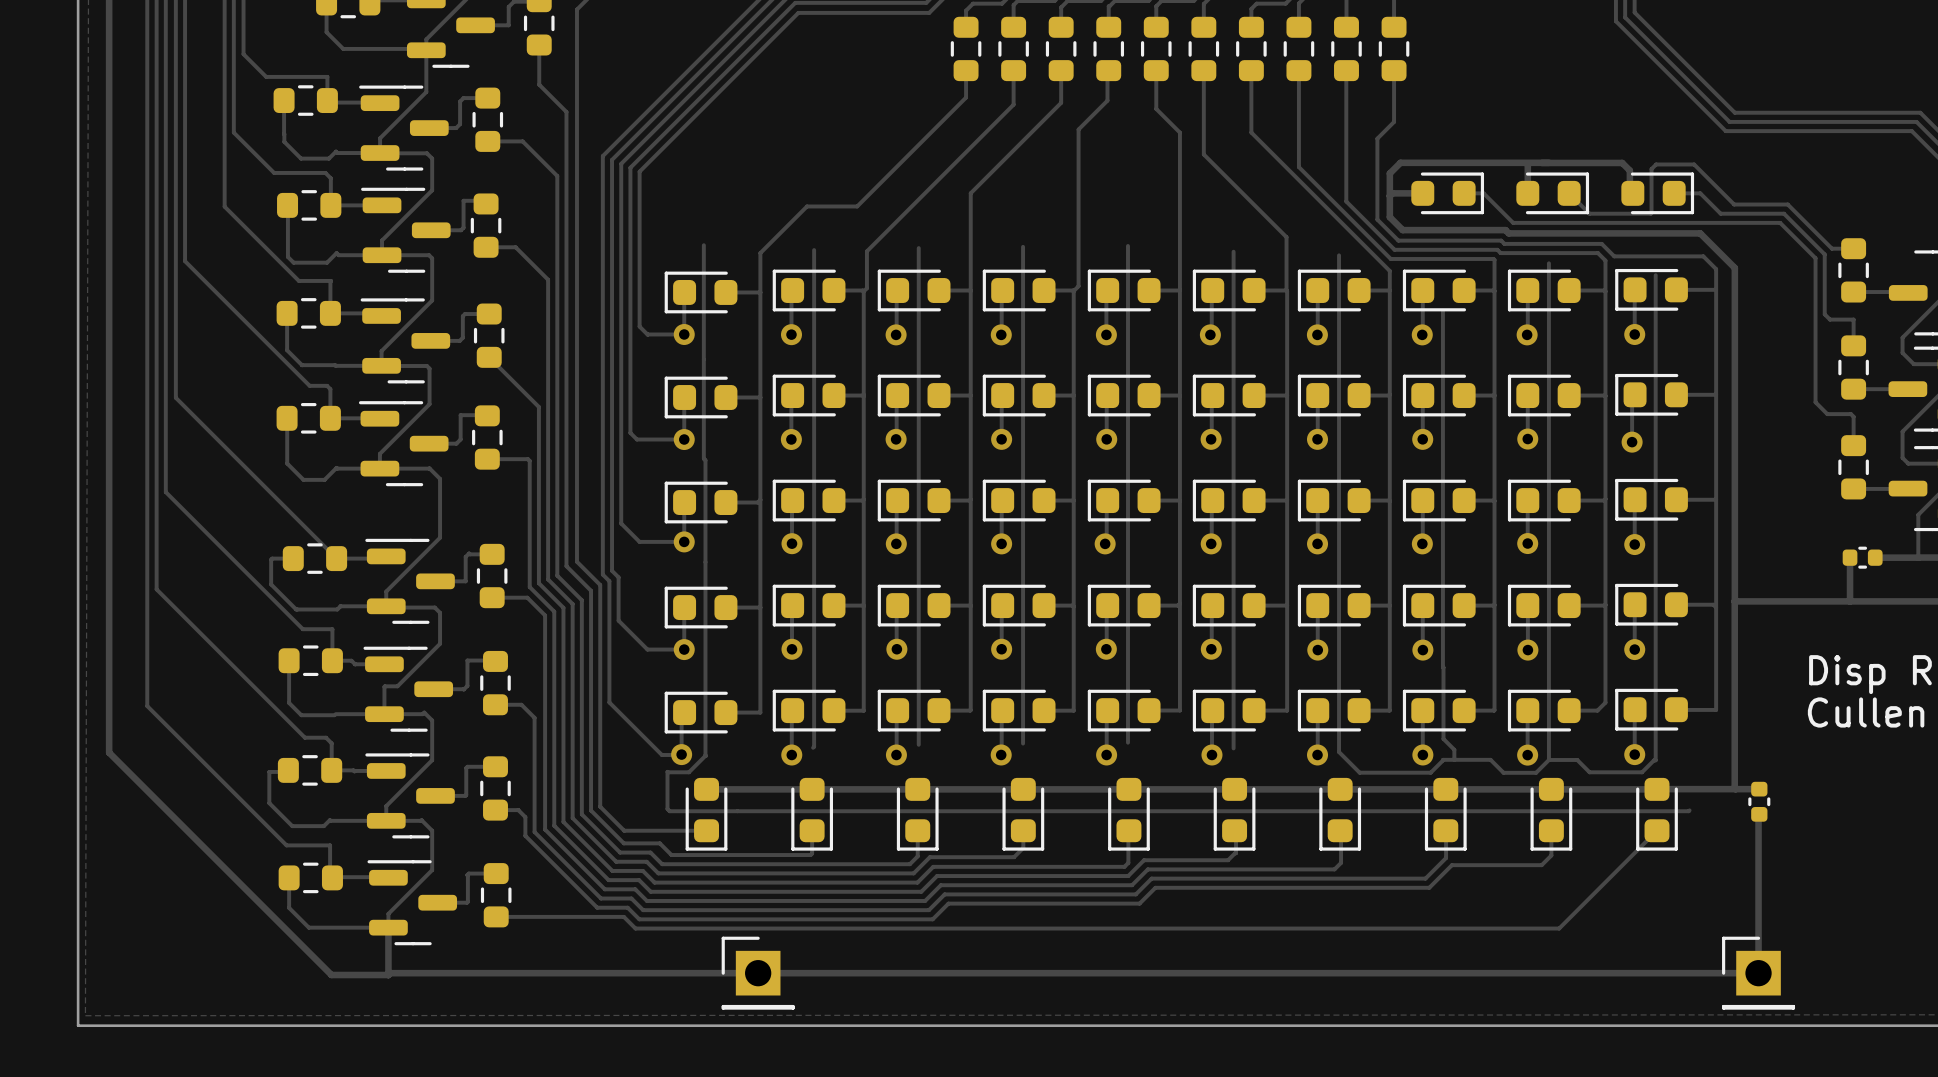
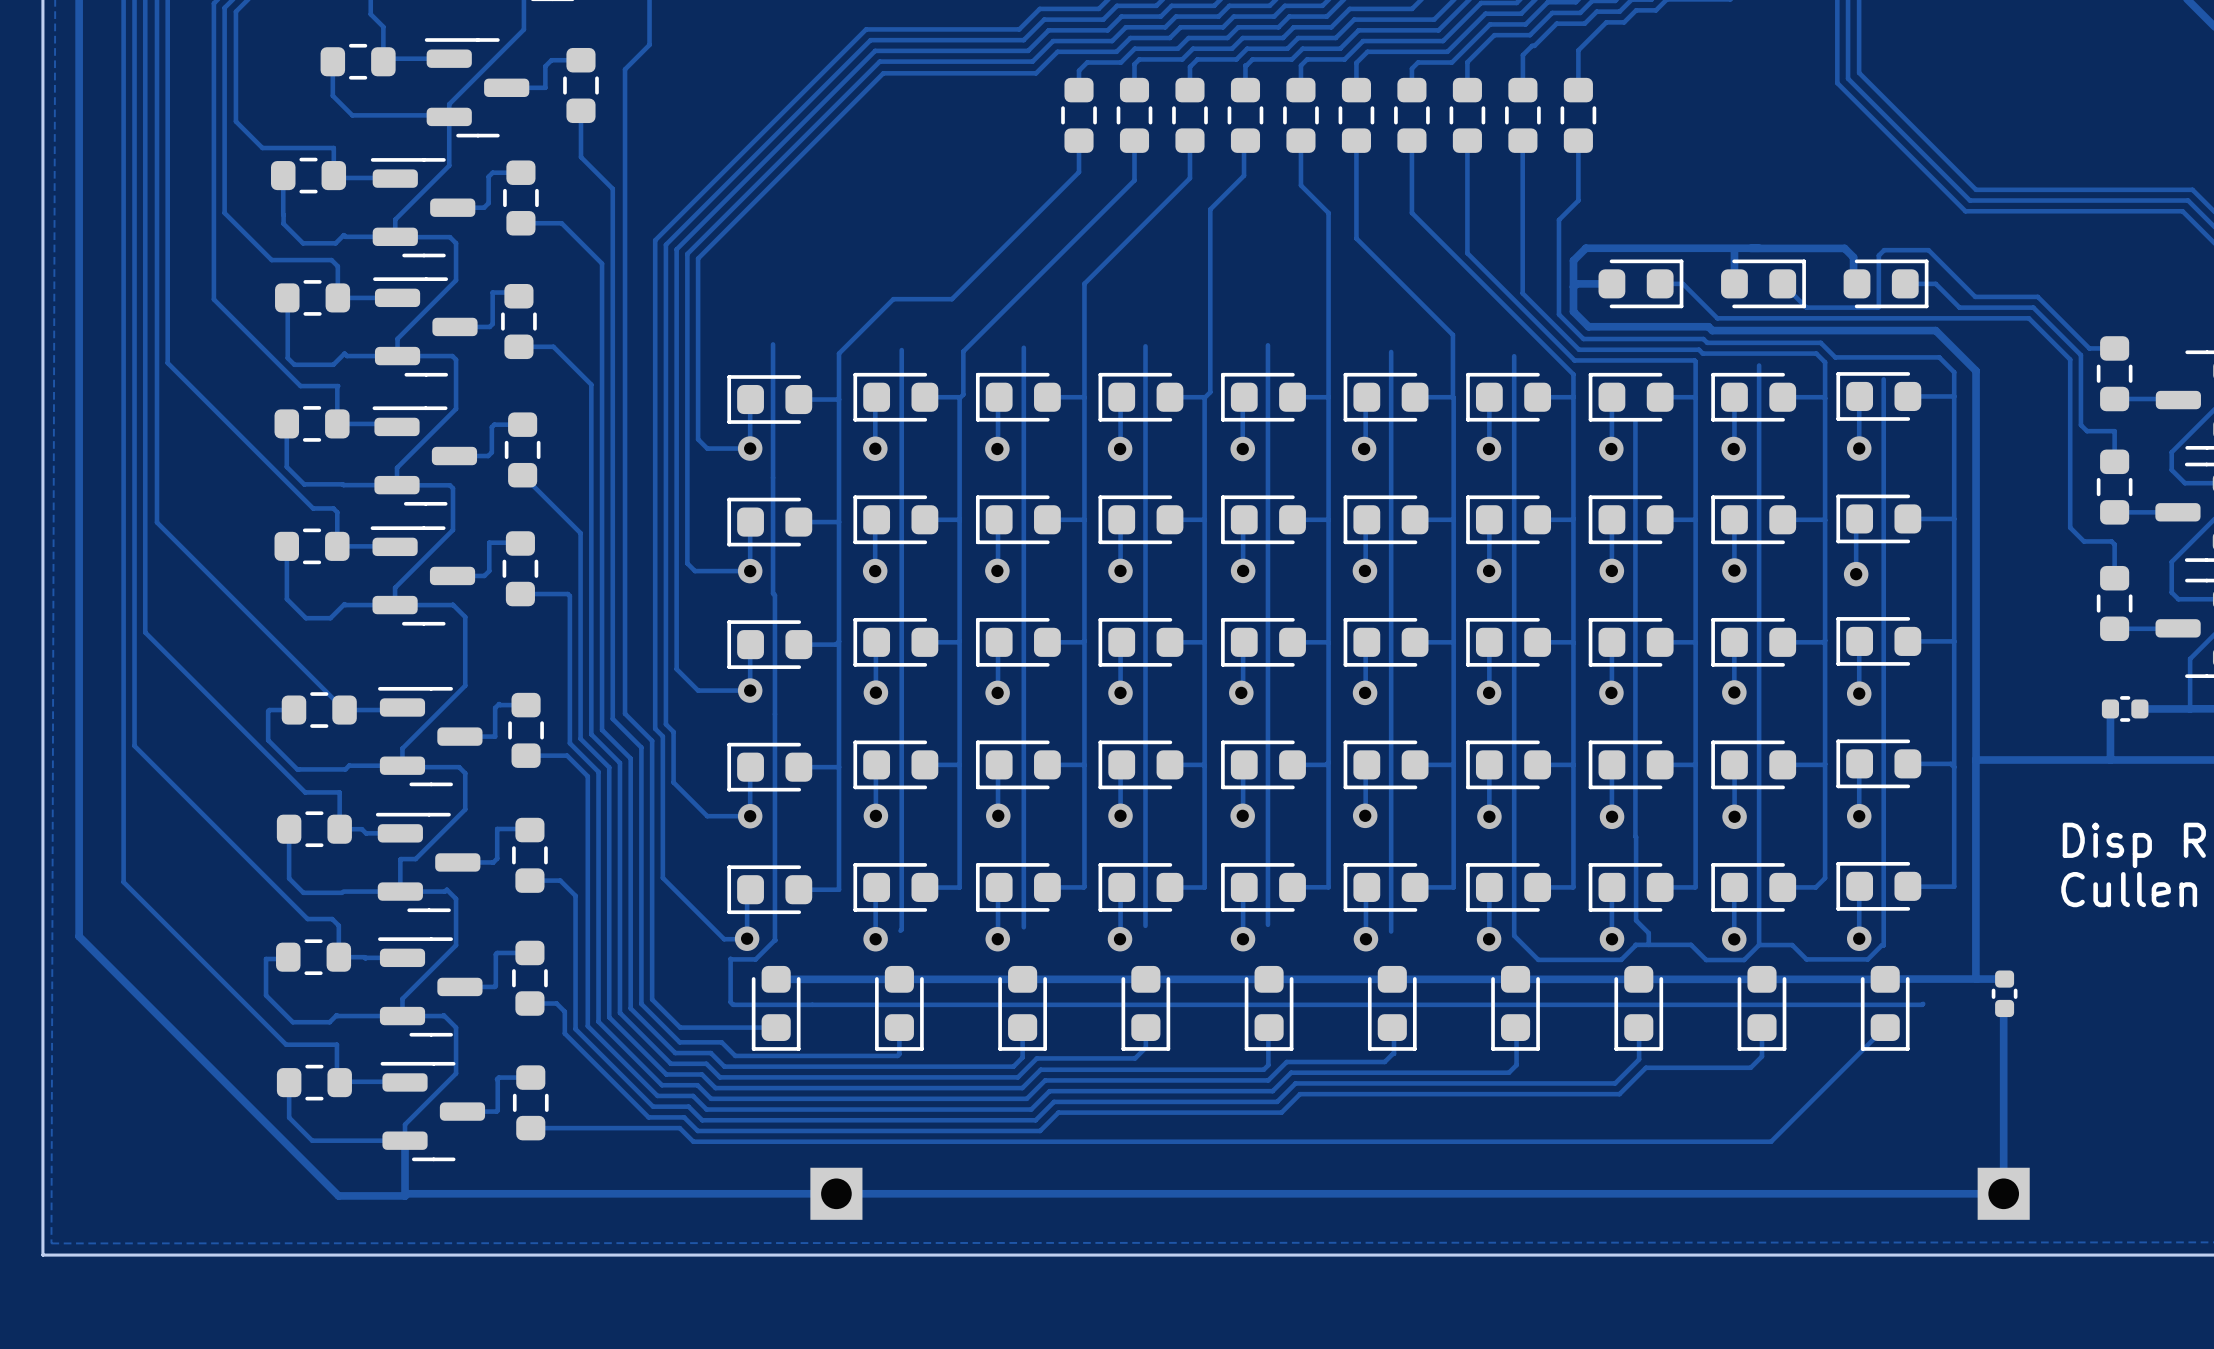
part side: top (758, 973) -> bottom (836, 1193)
part side: top (1758, 973) -> bottom (2003, 1193)

